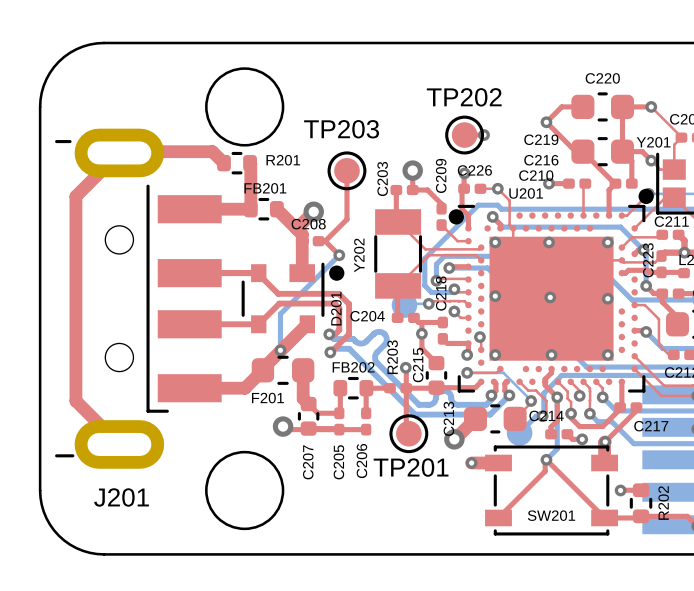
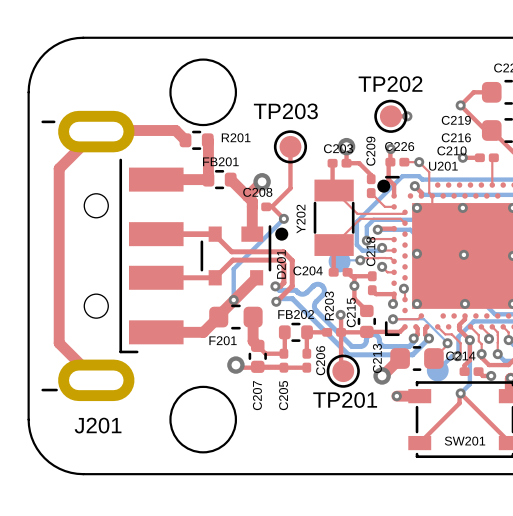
C203 name rotation: 0° (382, 178) -> 90° clockwise (338, 148)
C206 name position: C206 (361, 461) -> C206 (320, 360)

